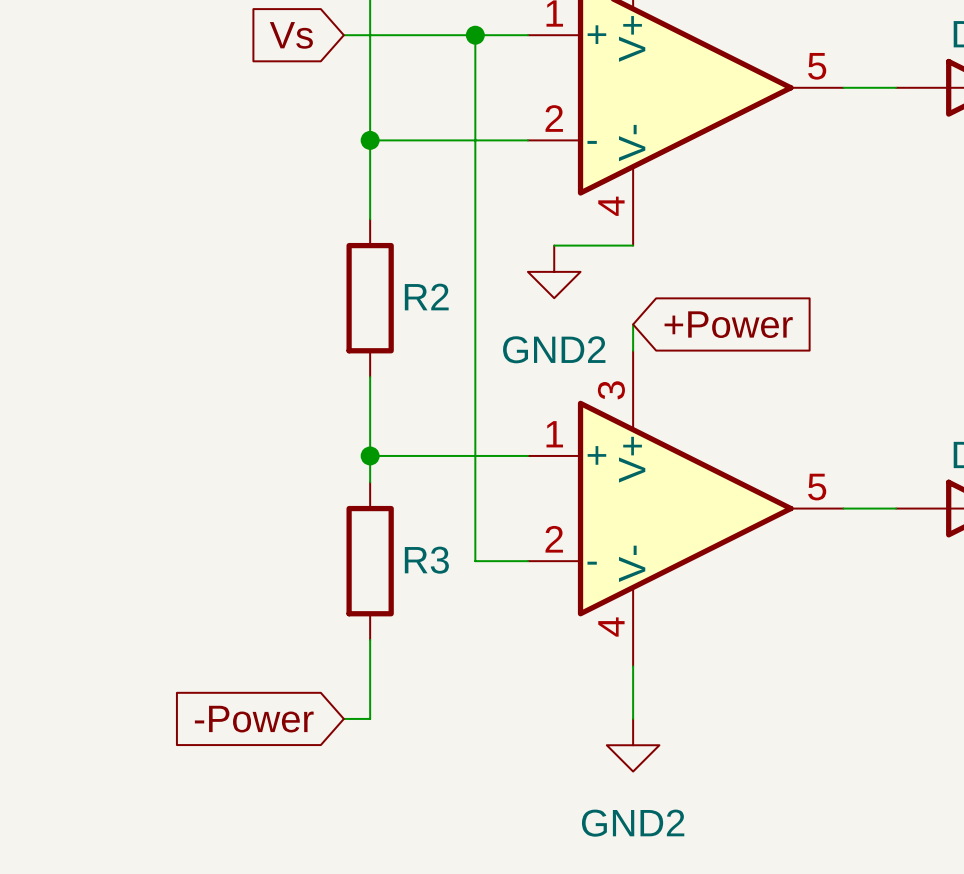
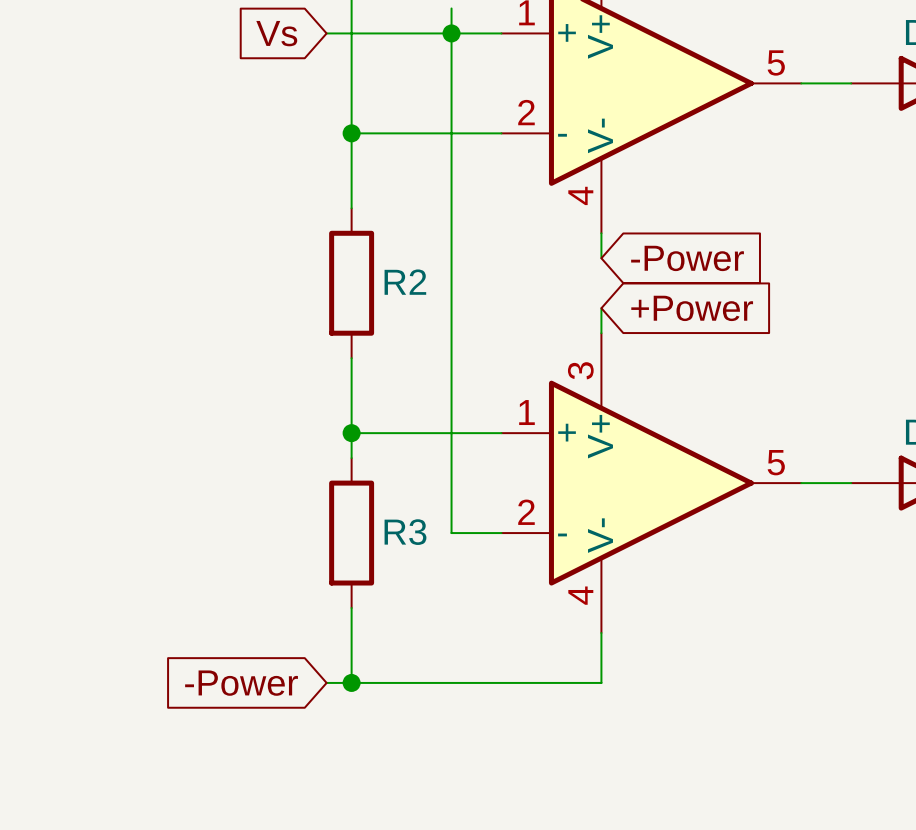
wire: none -> (451, 8) (451, 33)
wire: (554, 245) (633, 245) -> (601, 258) (601, 233)
power symbol: GND2 (554, 271) -> none
global label: none -> -Power (687, 258)
wire: none -> (351, 682) (601, 682)
junction: none -> (351, 682)
power symbol: GND2 (633, 745) -> none

